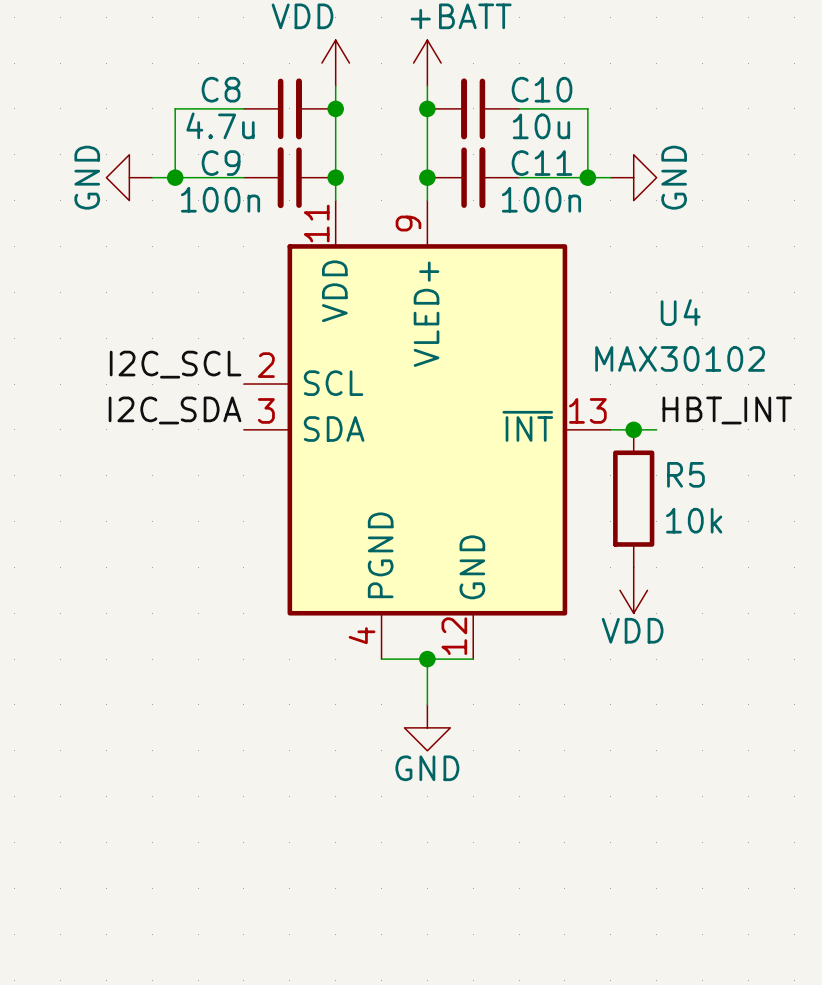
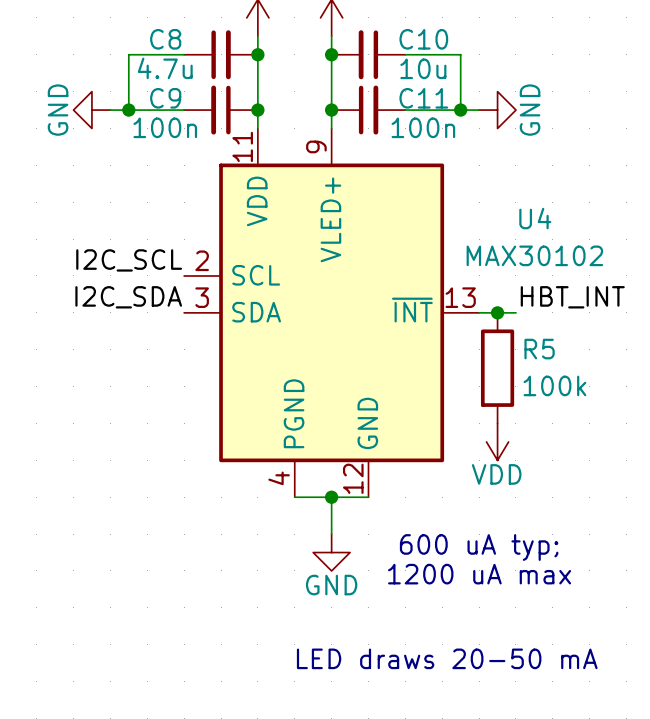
R5 value: 10k (694, 520) -> 100k (554, 385)
text: none -> 600 uA typ; (479, 547)
text: none -> 1200 uA max (479, 574)
text: none -> LED draws 20-50 mA (447, 658)

